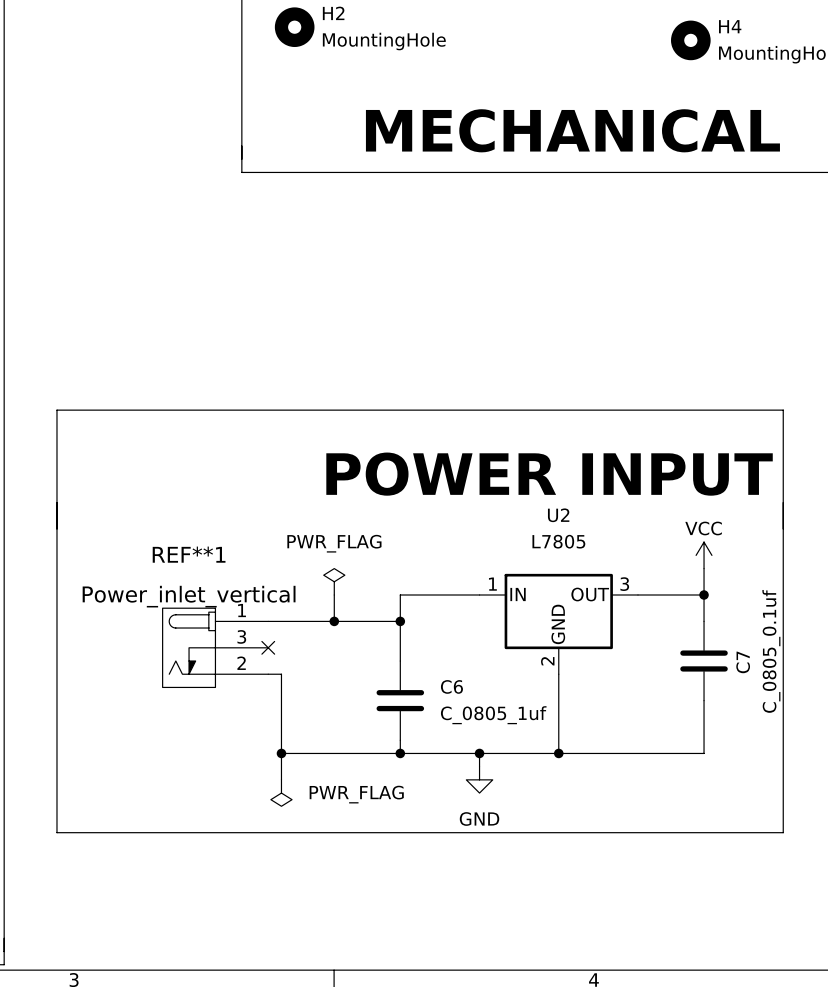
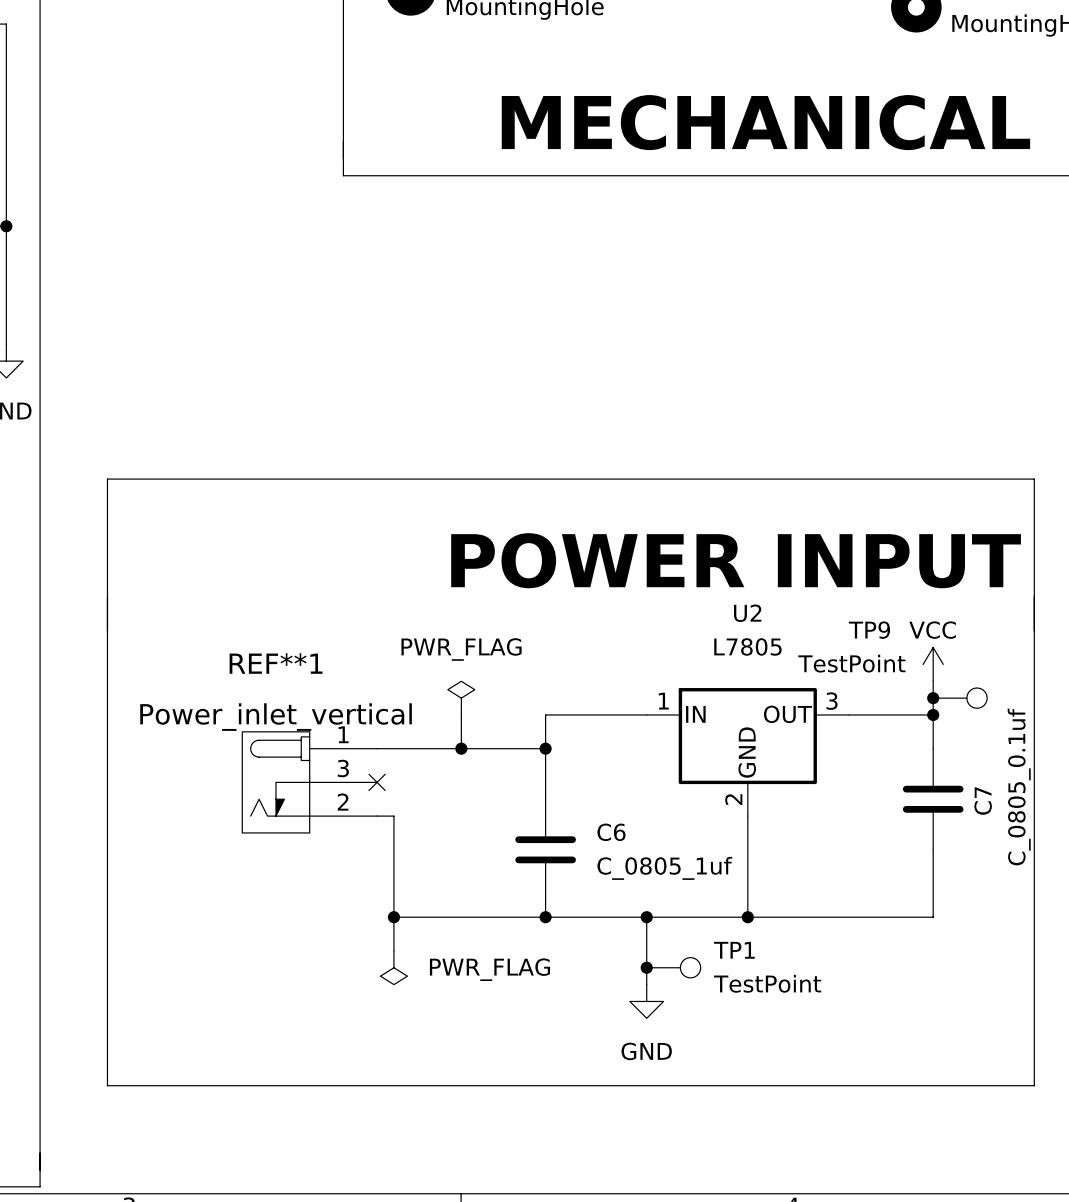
junction: none -> (933, 698)
TP9: none -> TestPoint (960, 698)
wire: none -> (646, 934) (646, 984)
power symbol position: GND (479, 779) -> GND (646, 1001)
junction: none -> (646, 967)
TP1: none -> TestPoint (673, 967)
line: (56, 832) (783, 832) -> (107, 1018) (107, 1085) (1034, 1085) (1034, 1018)

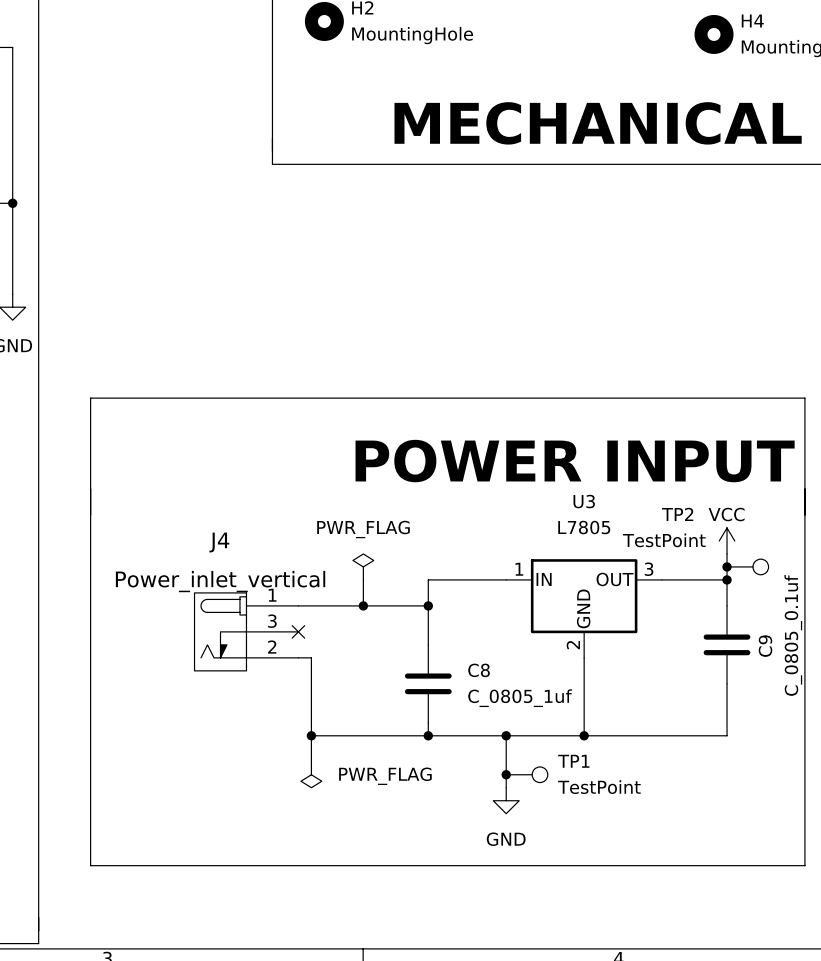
U2 name: U2 (747, 613) -> U3 (584, 501)
TP9 name: TP9 (869, 630) -> TP2 (677, 514)
REF**1 name: REF**1 (276, 663) -> J4 (219, 542)
C7 name: C7 (983, 801) -> C9 (765, 646)
C6 name: C6 (611, 832) -> C8 (479, 670)

